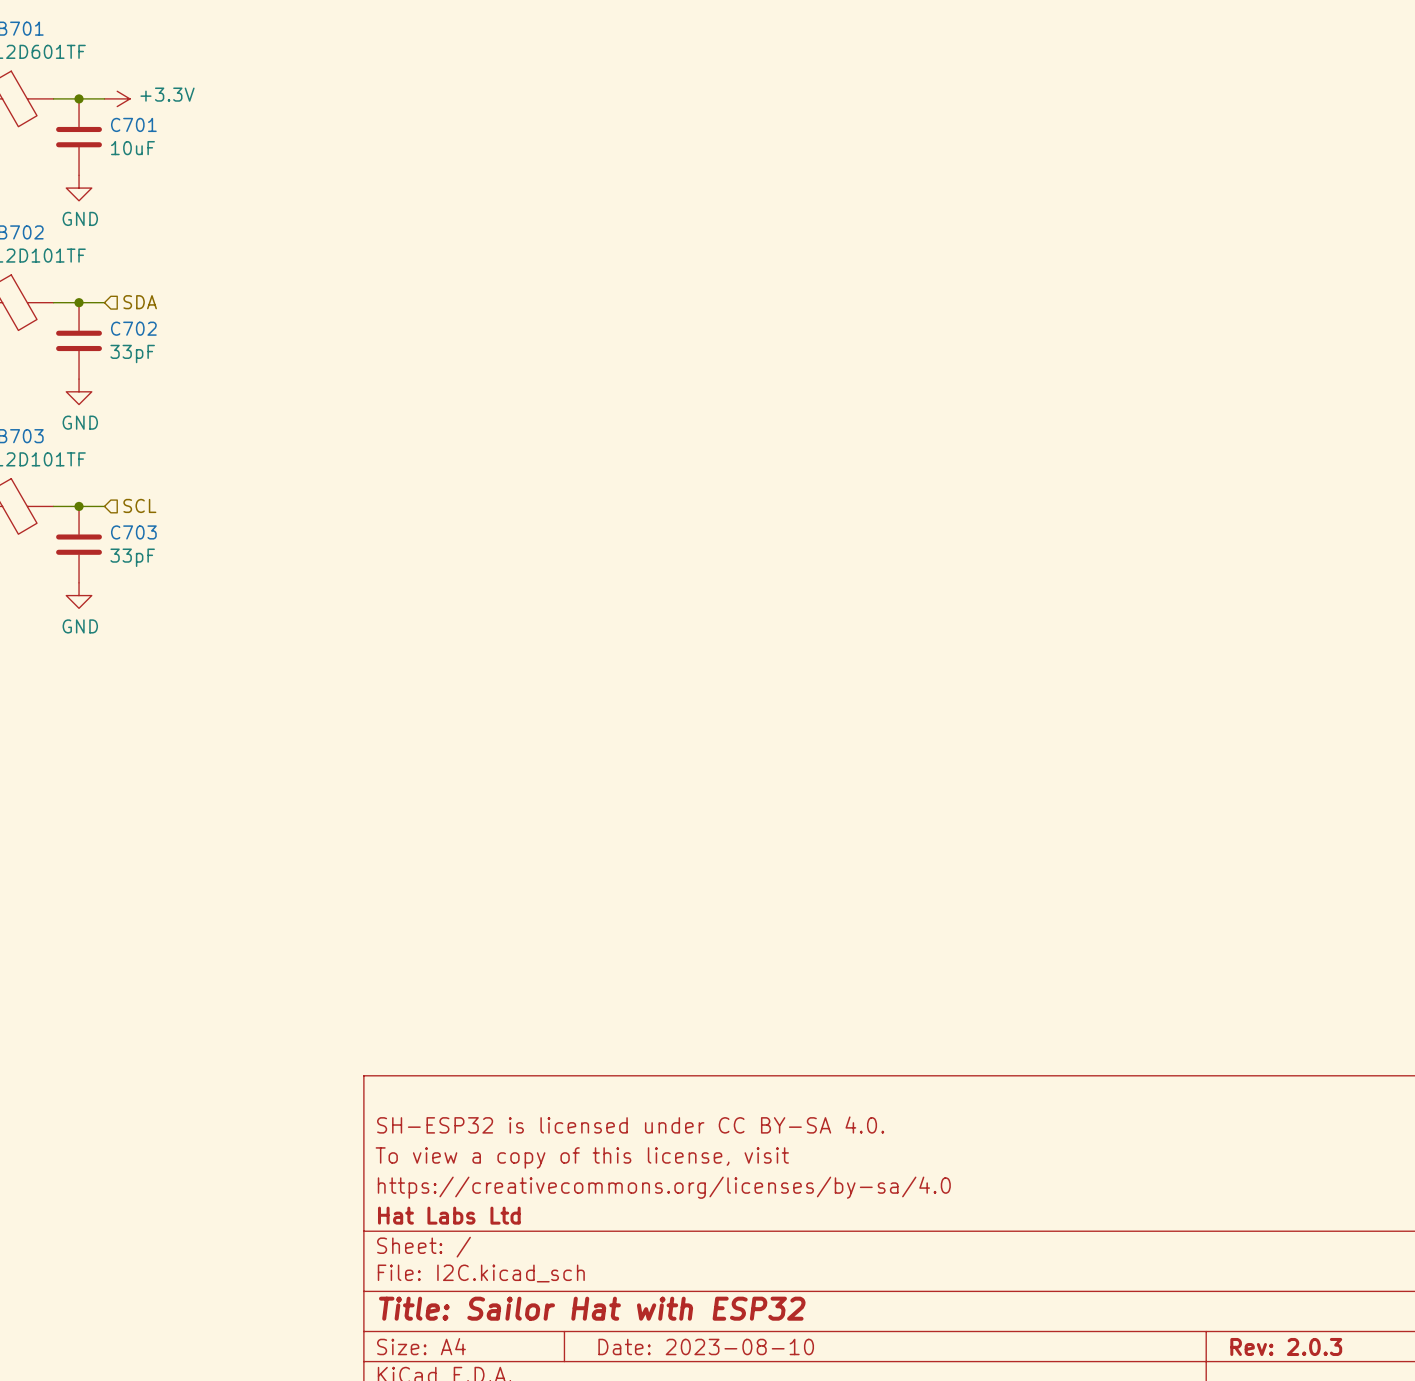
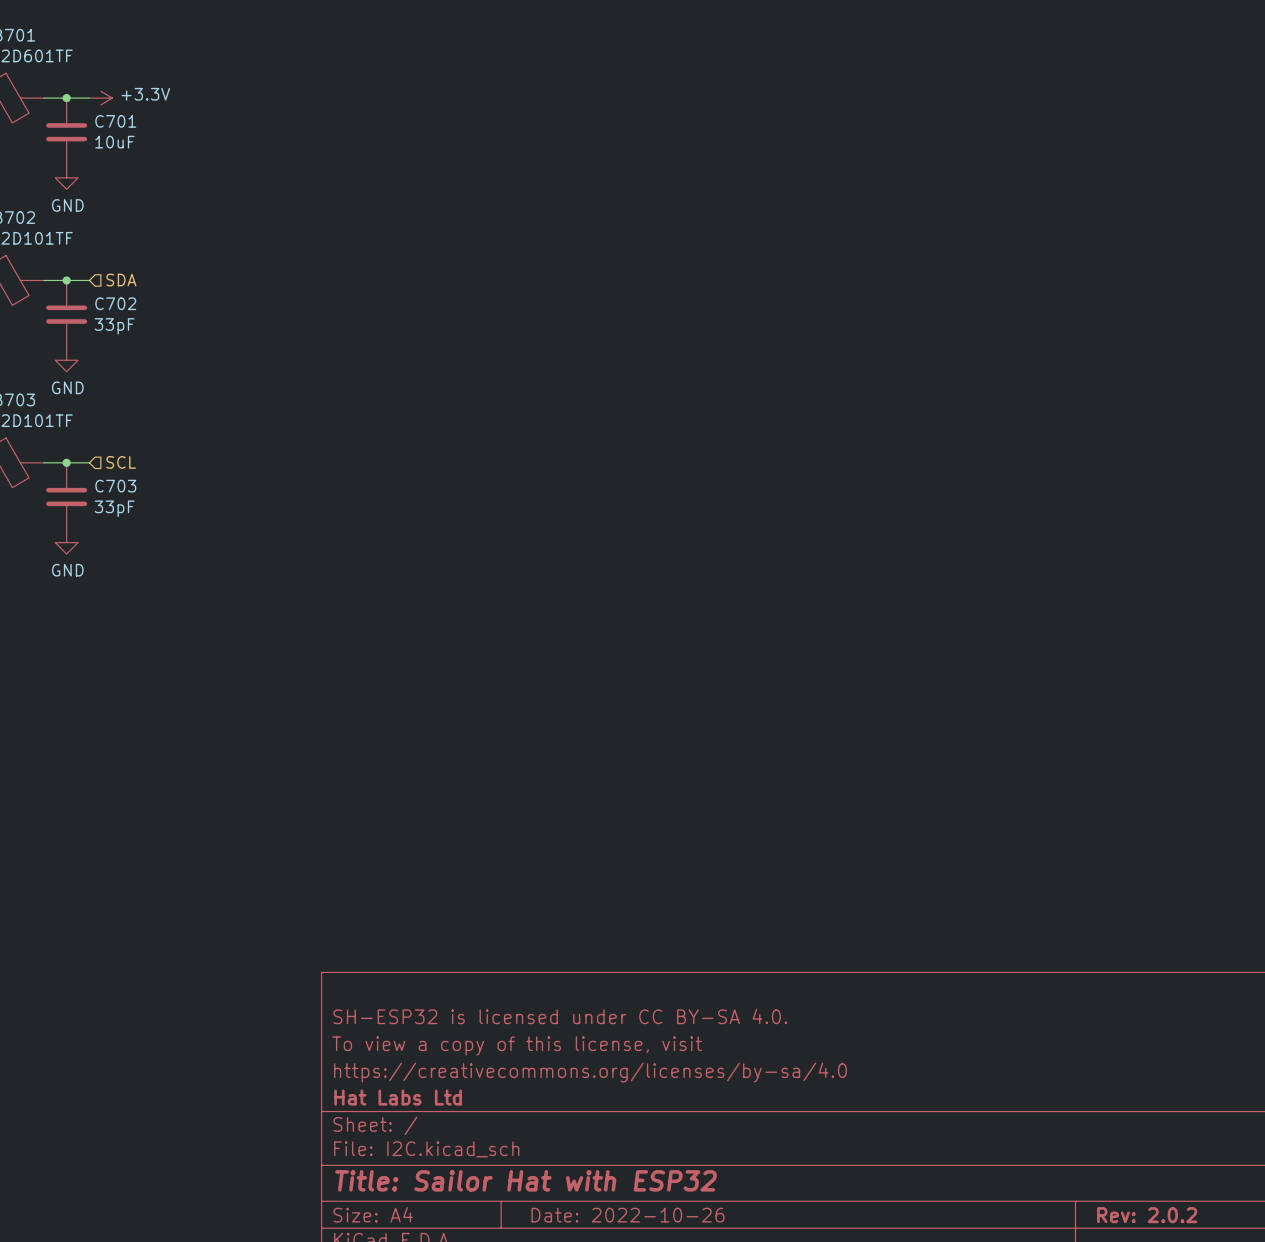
title block: Date: 2023-08-10 (706, 1346) -> Date: 2022-10-26 (628, 1215)
title block: Rev: 2.0.3 (1286, 1346) -> Rev: 2.0.2 (1147, 1215)

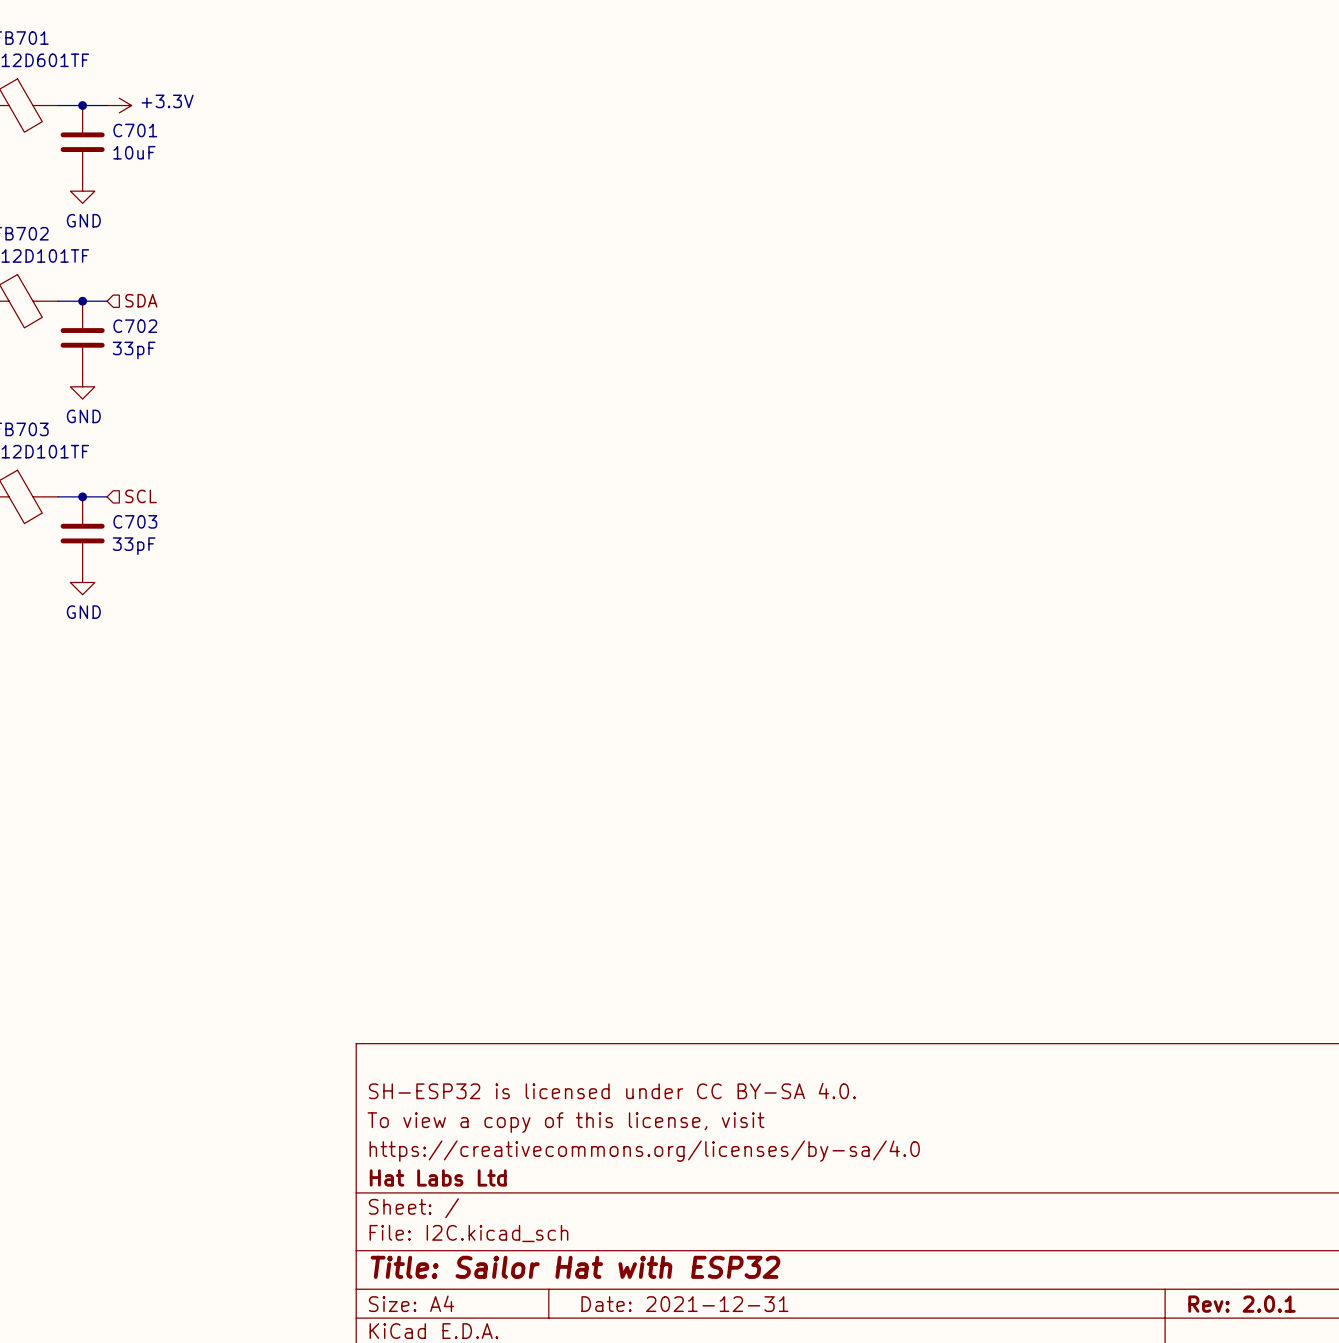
title block: Date: 2022-10-26 (628, 1215) -> Date: 2021-12-31 (684, 1304)
title block: Rev: 2.0.2 (1147, 1215) -> Rev: 2.0.1 (1241, 1304)

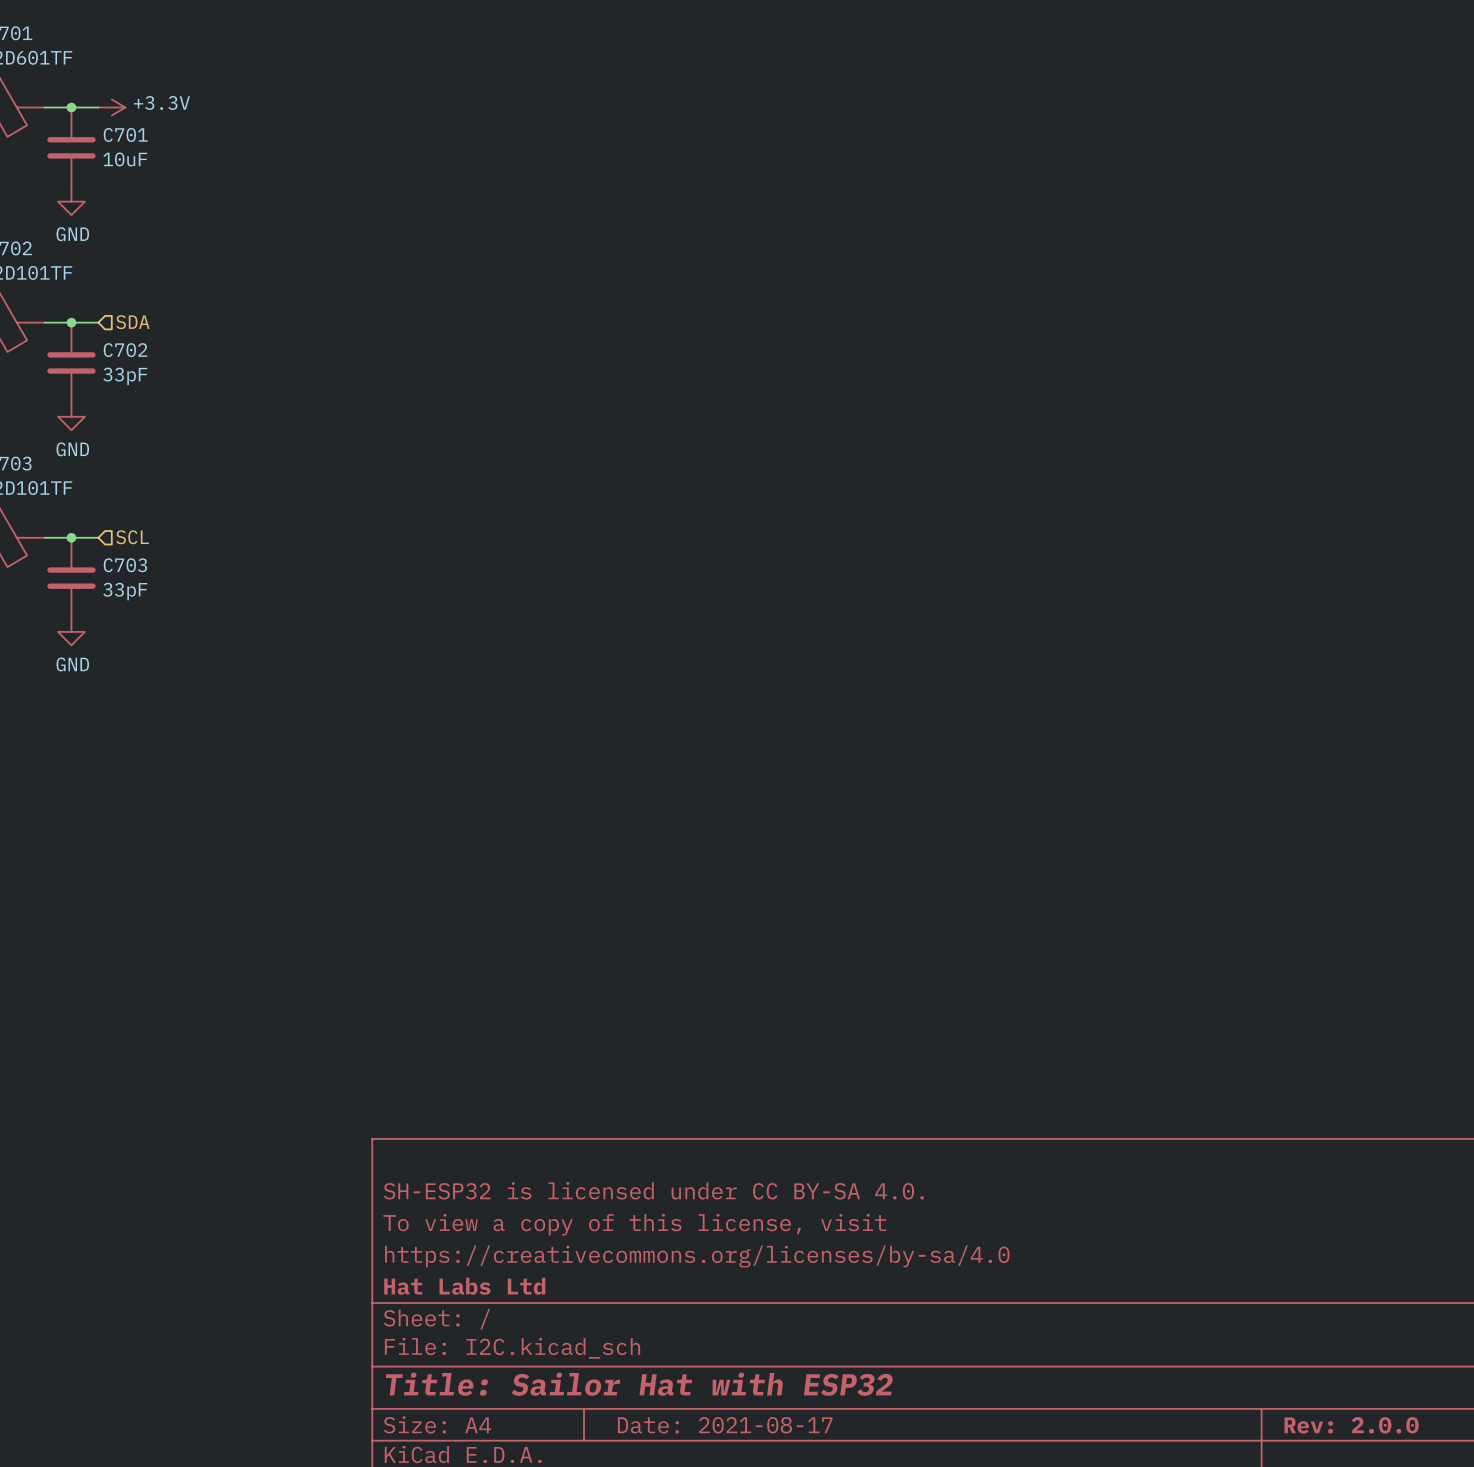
title block: Date: 2021-12-31 (684, 1304) -> Date: 2021-08-17 (725, 1425)
title block: Rev: 2.0.1 (1241, 1304) -> Rev: 2.0.0 (1351, 1425)

